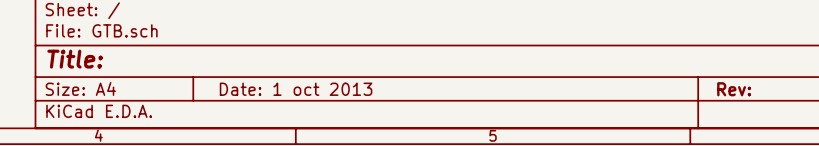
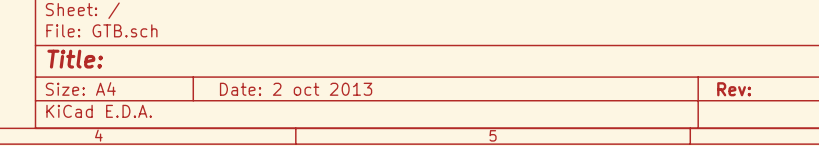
title block: Date: 1 oct 2013 (296, 89) -> Date: 2 oct 2013 (296, 89)

